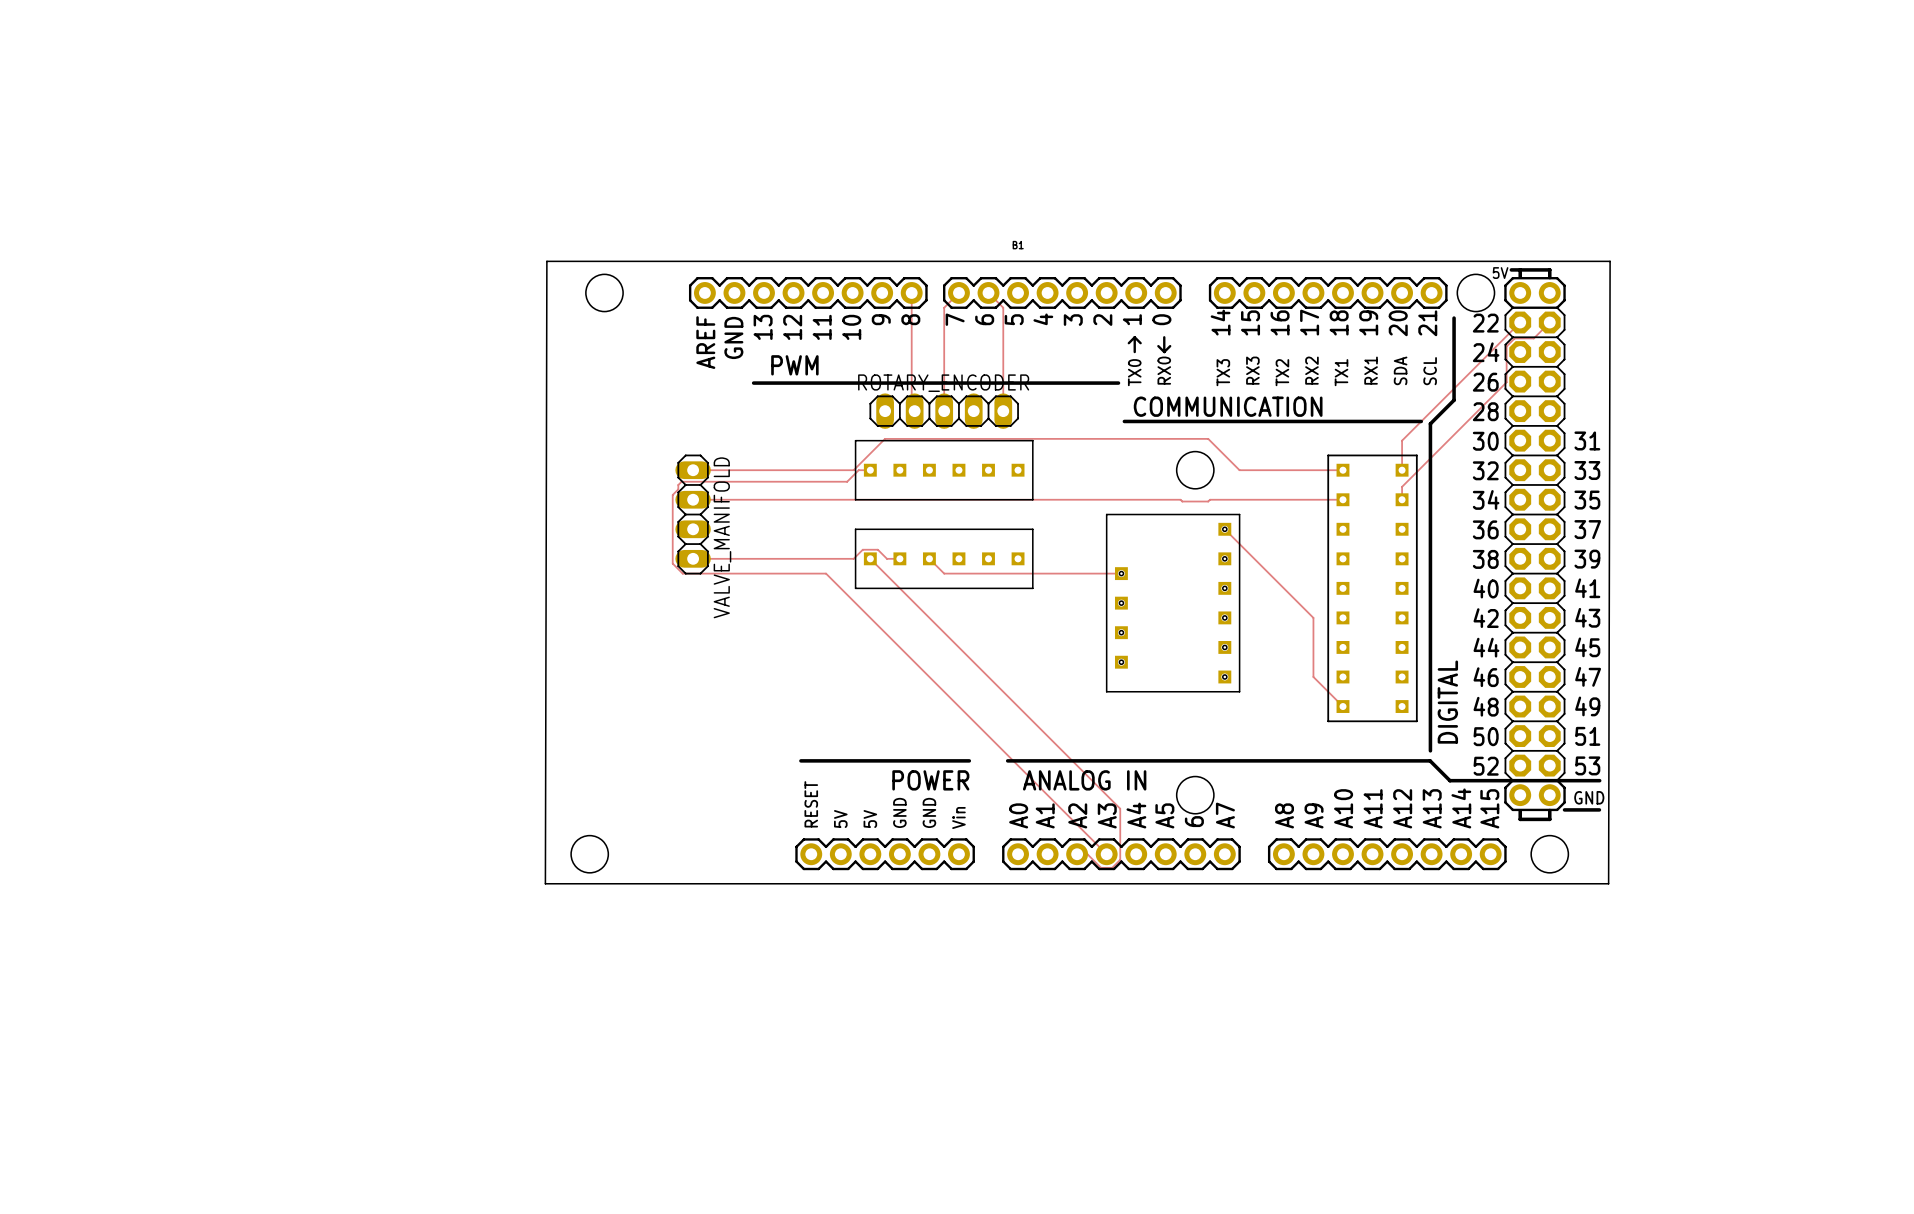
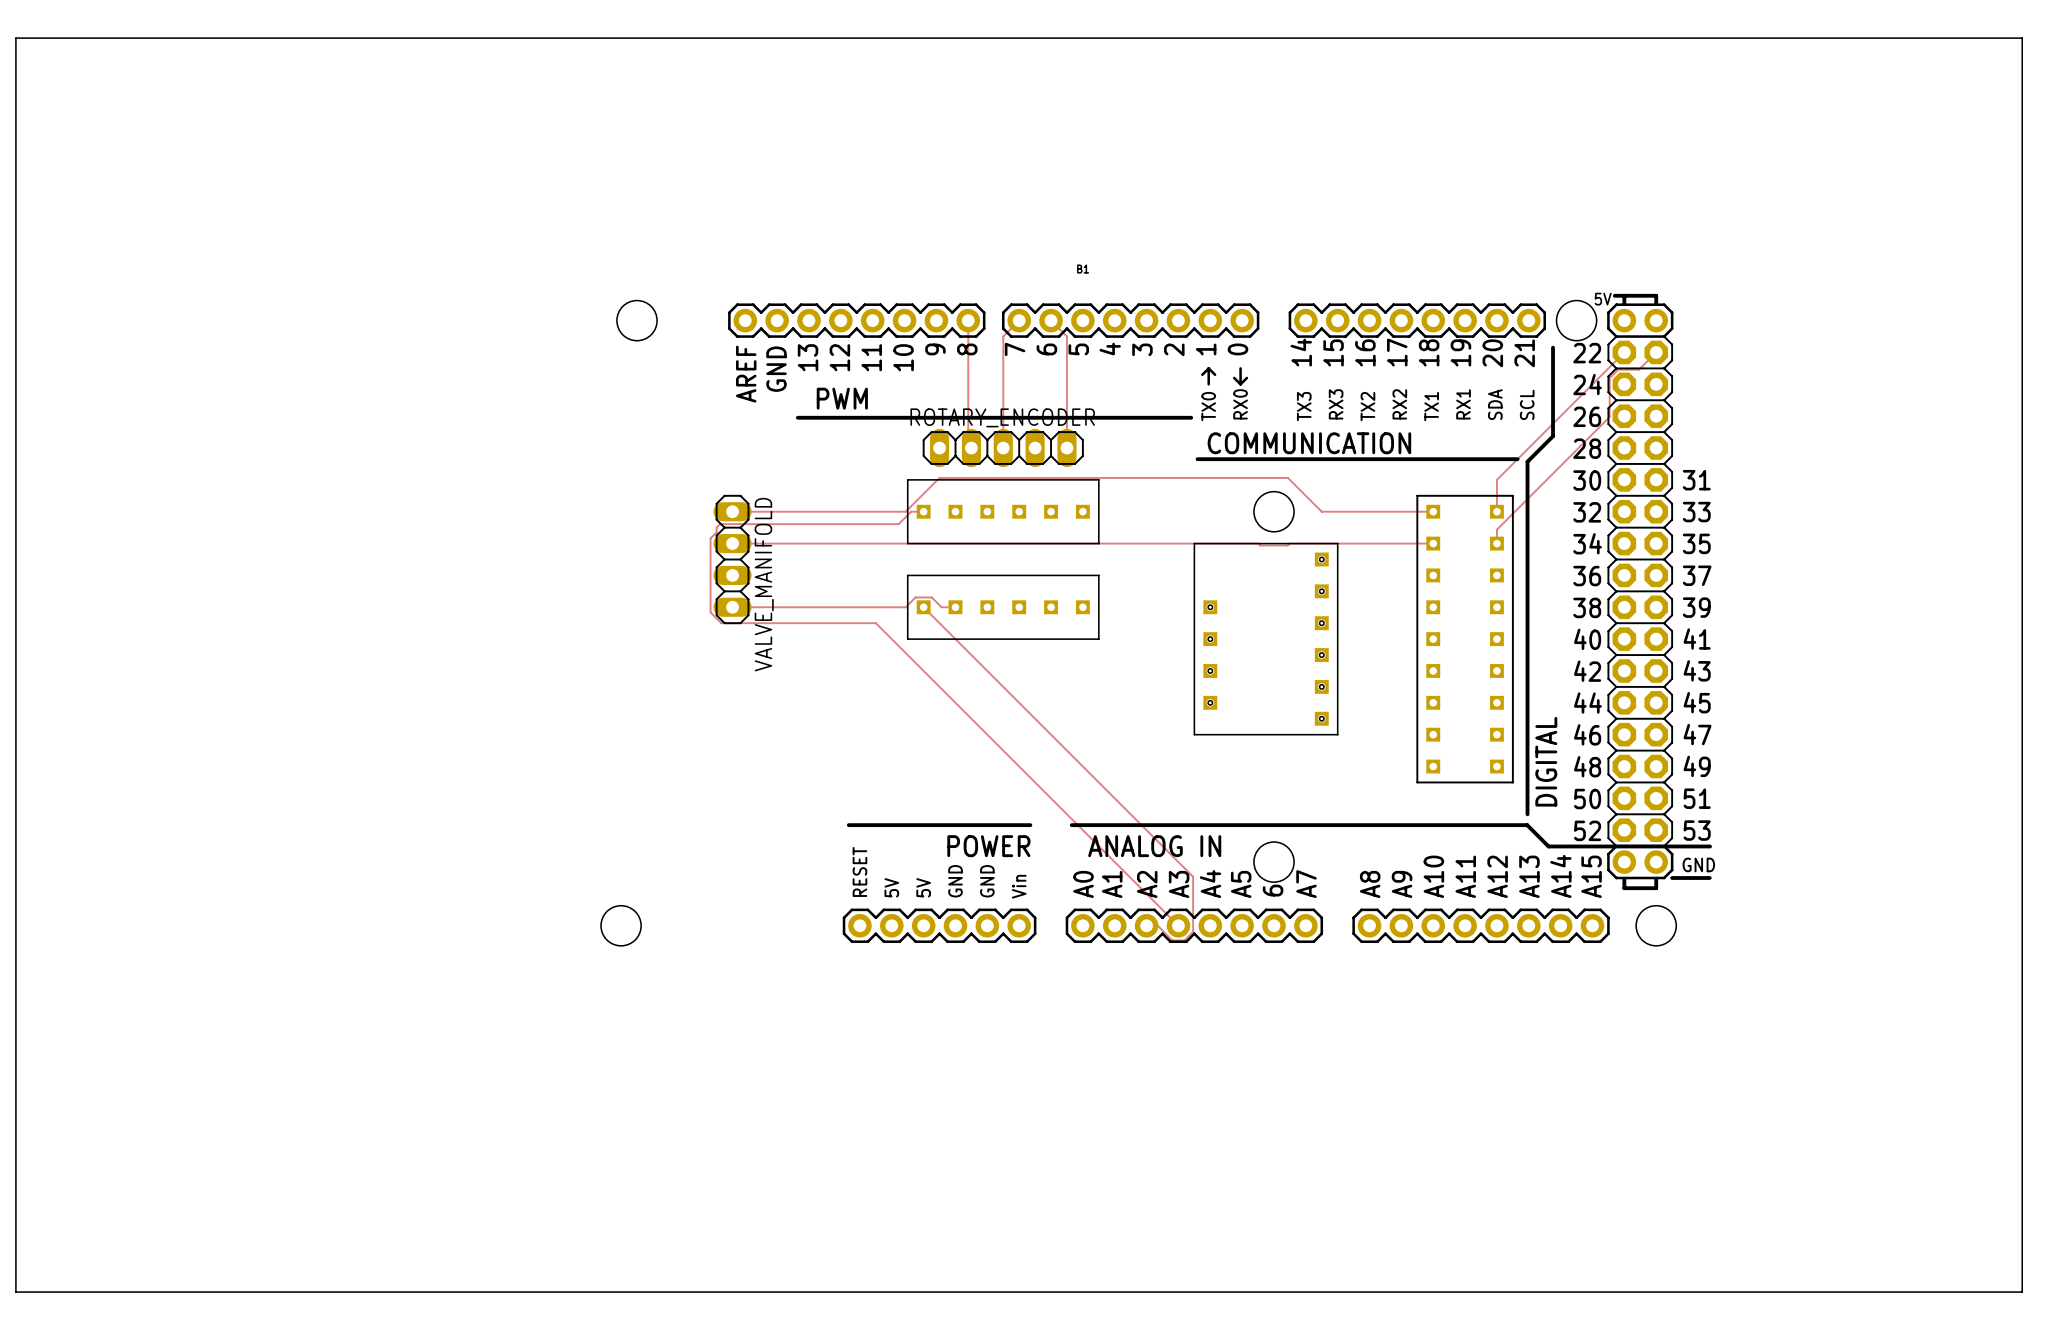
board edge: none -> (15, 38) (2022, 38) (2022, 1292) (15, 1292) (15, 38)
board edge: (546, 261) (1610, 261) (1608, 883) (545, 883) (546, 261) -> none
track: (1224, 529) (1313, 617) (1313, 676) (1342, 706) -> none
track: (929, 558) (944, 573) (1121, 573) -> none
part position: (1173, 603) -> (1266, 639)

